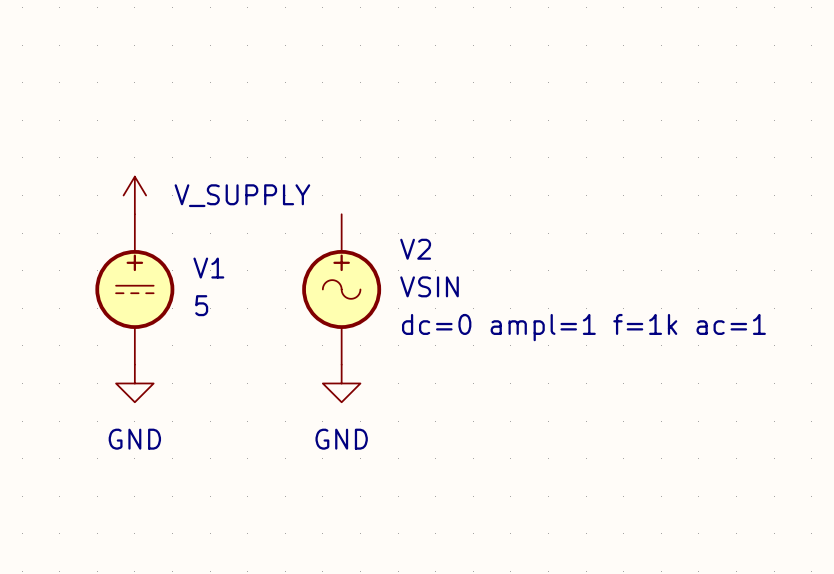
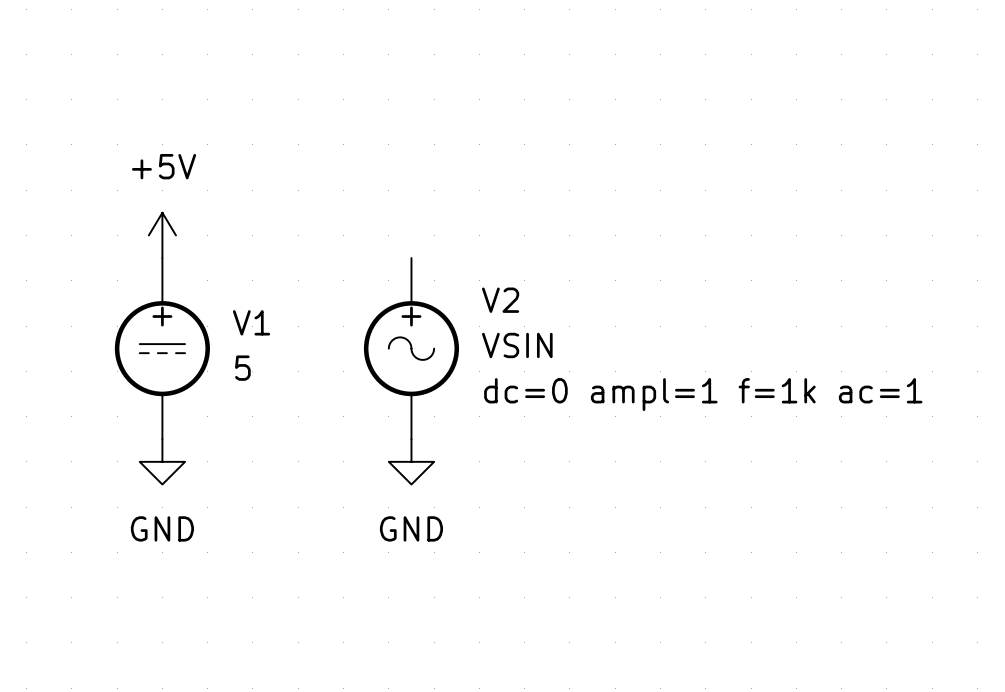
power symbol: V_SUPPLY (134, 195) -> +5V (162, 235)

